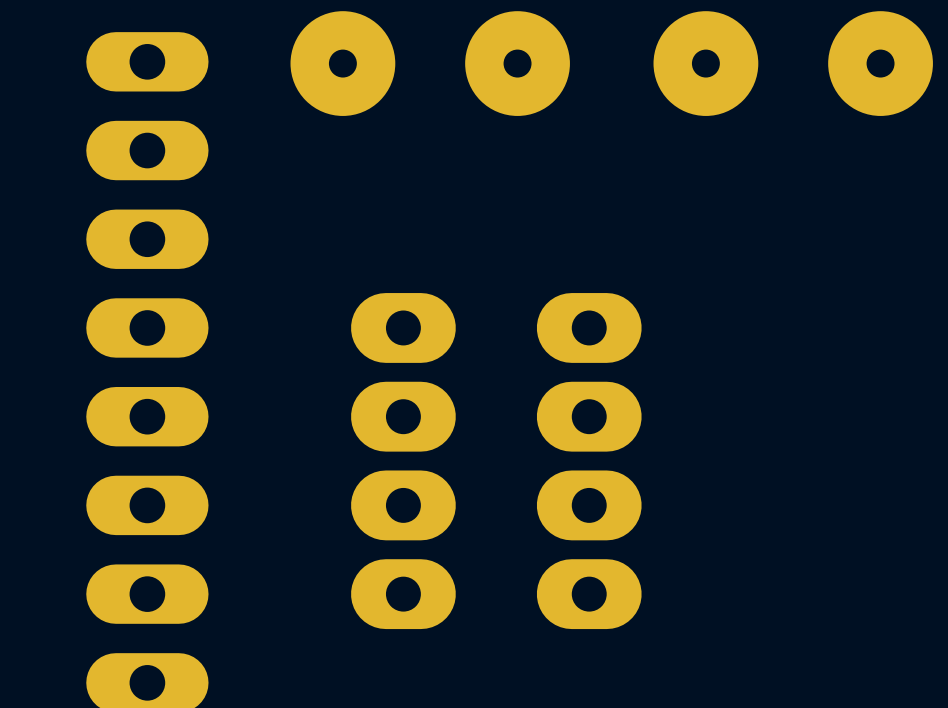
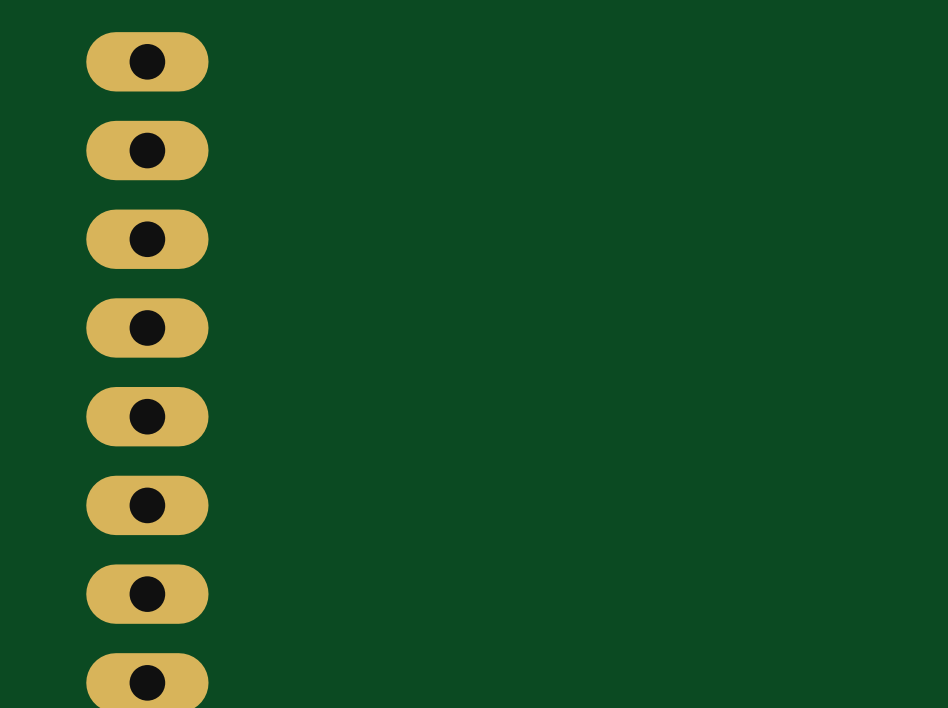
part: (430, 63) -> none
part: (793, 63) -> none
part: (403, 461) -> none
part: (589, 461) -> none

